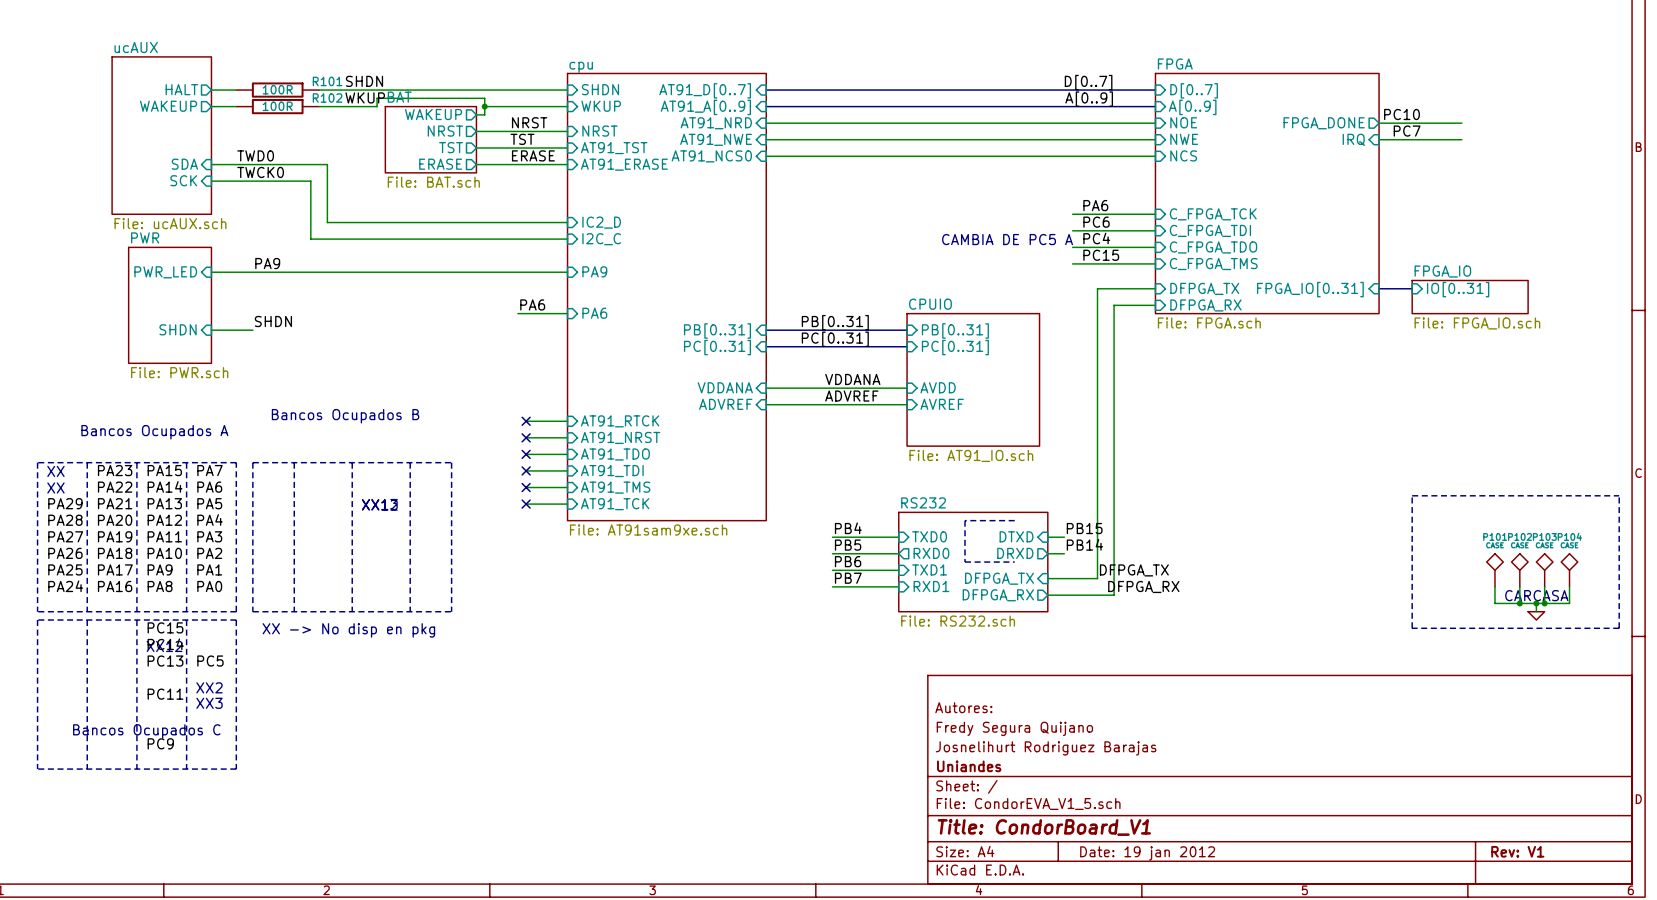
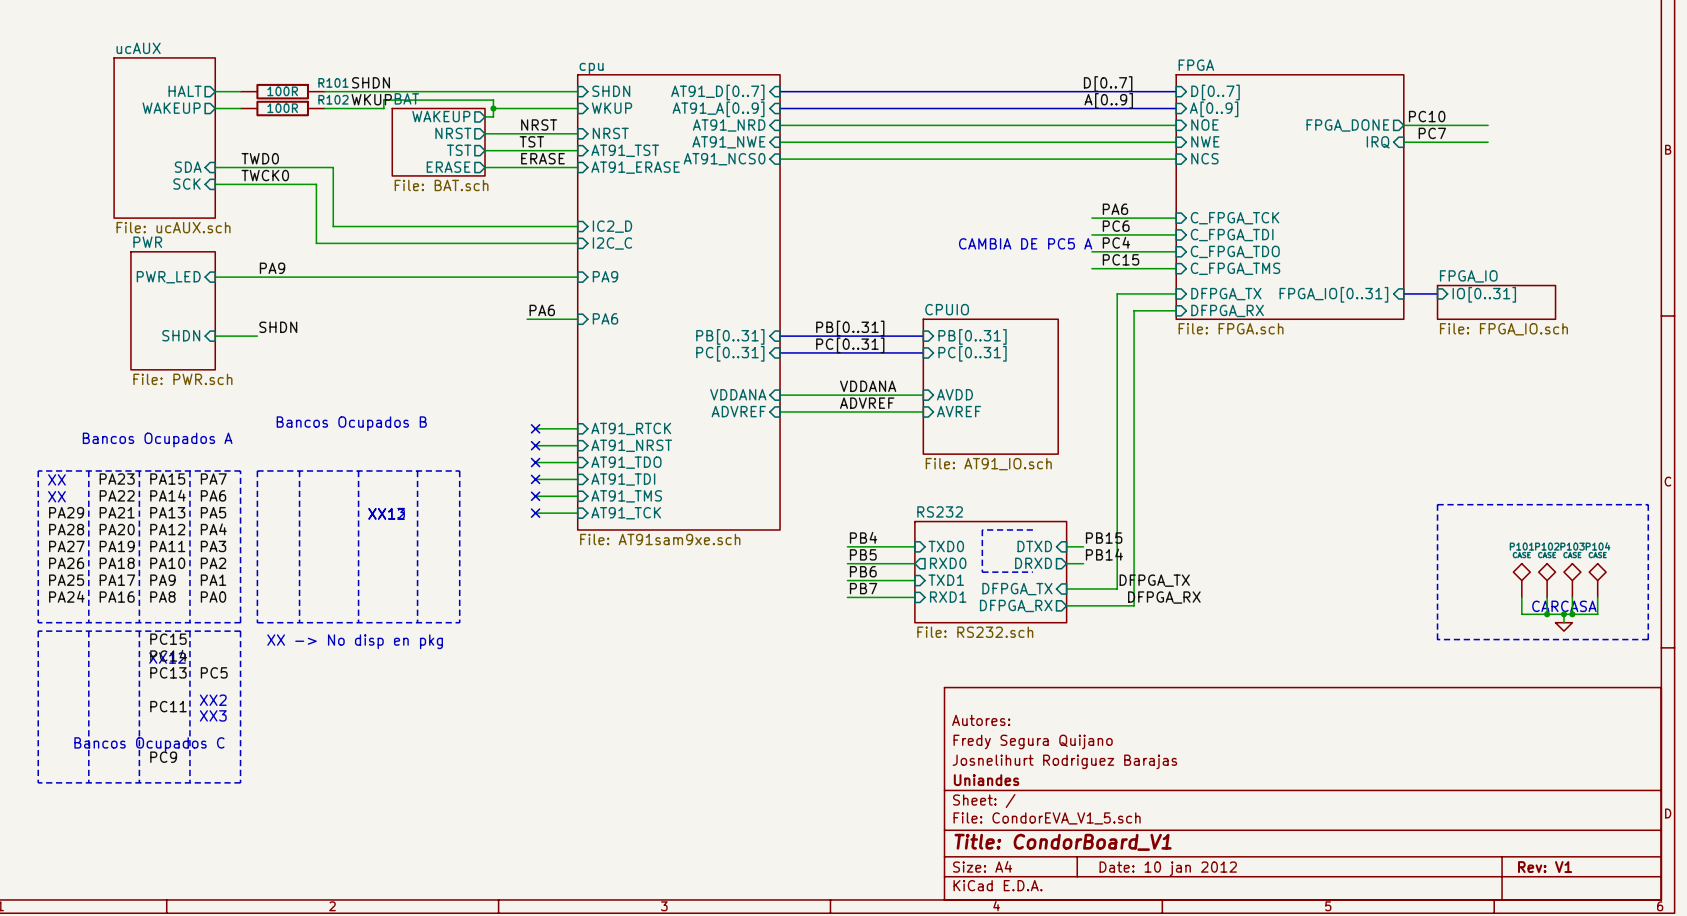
title block: Date: 19 jan 2012 (1147, 853) -> Date: 10 jan 2012 (1168, 868)

